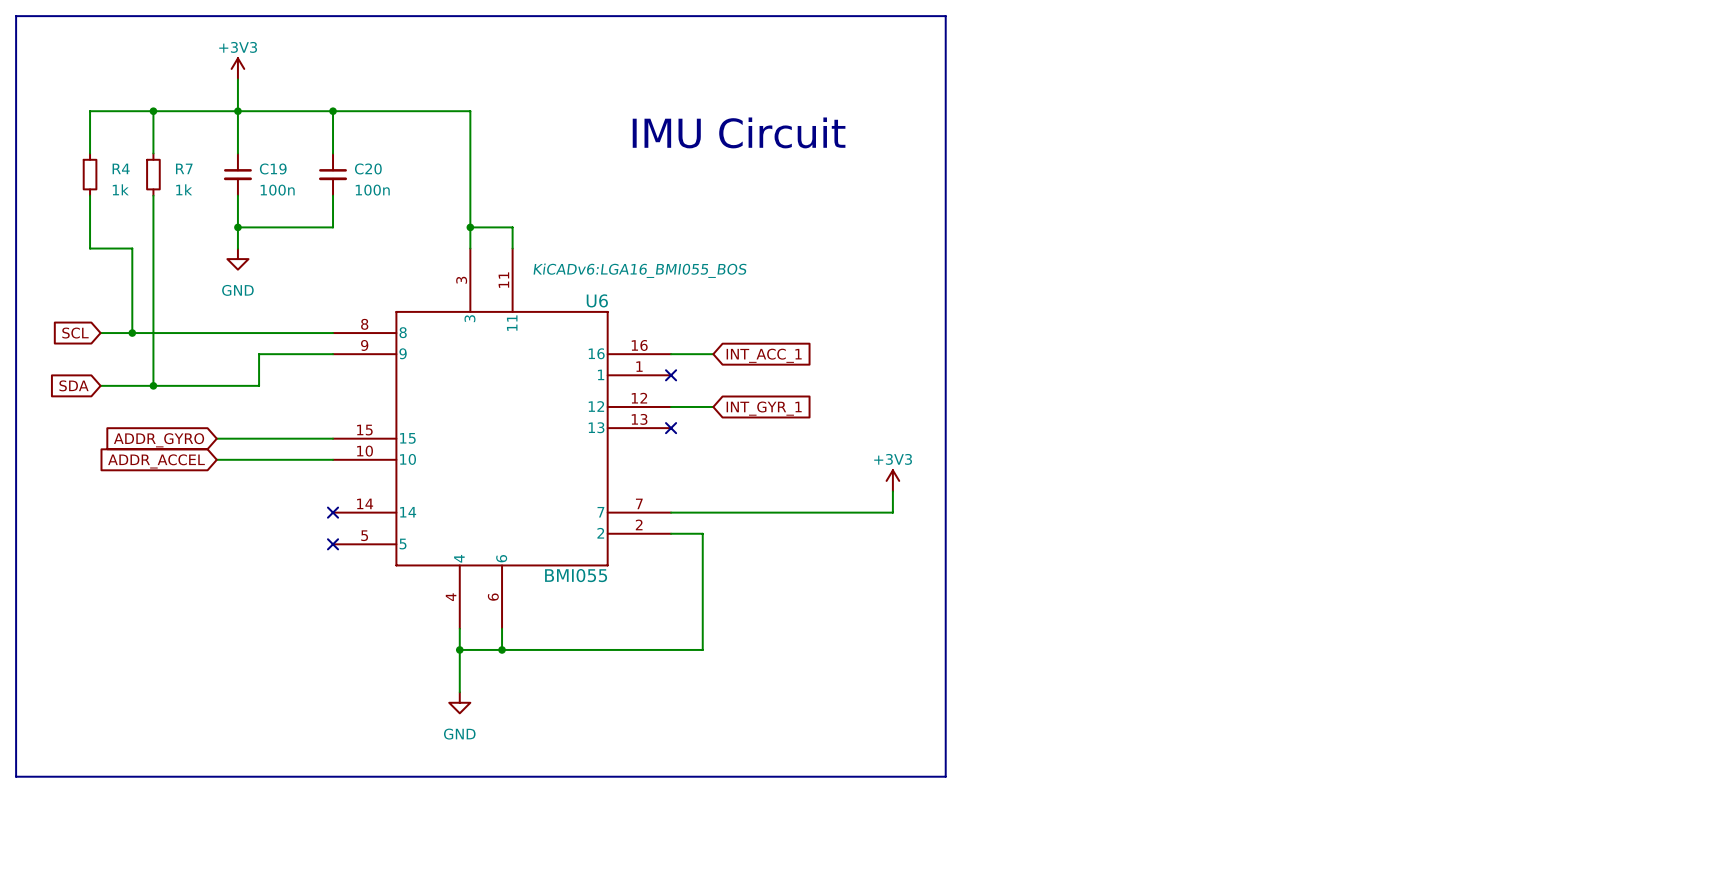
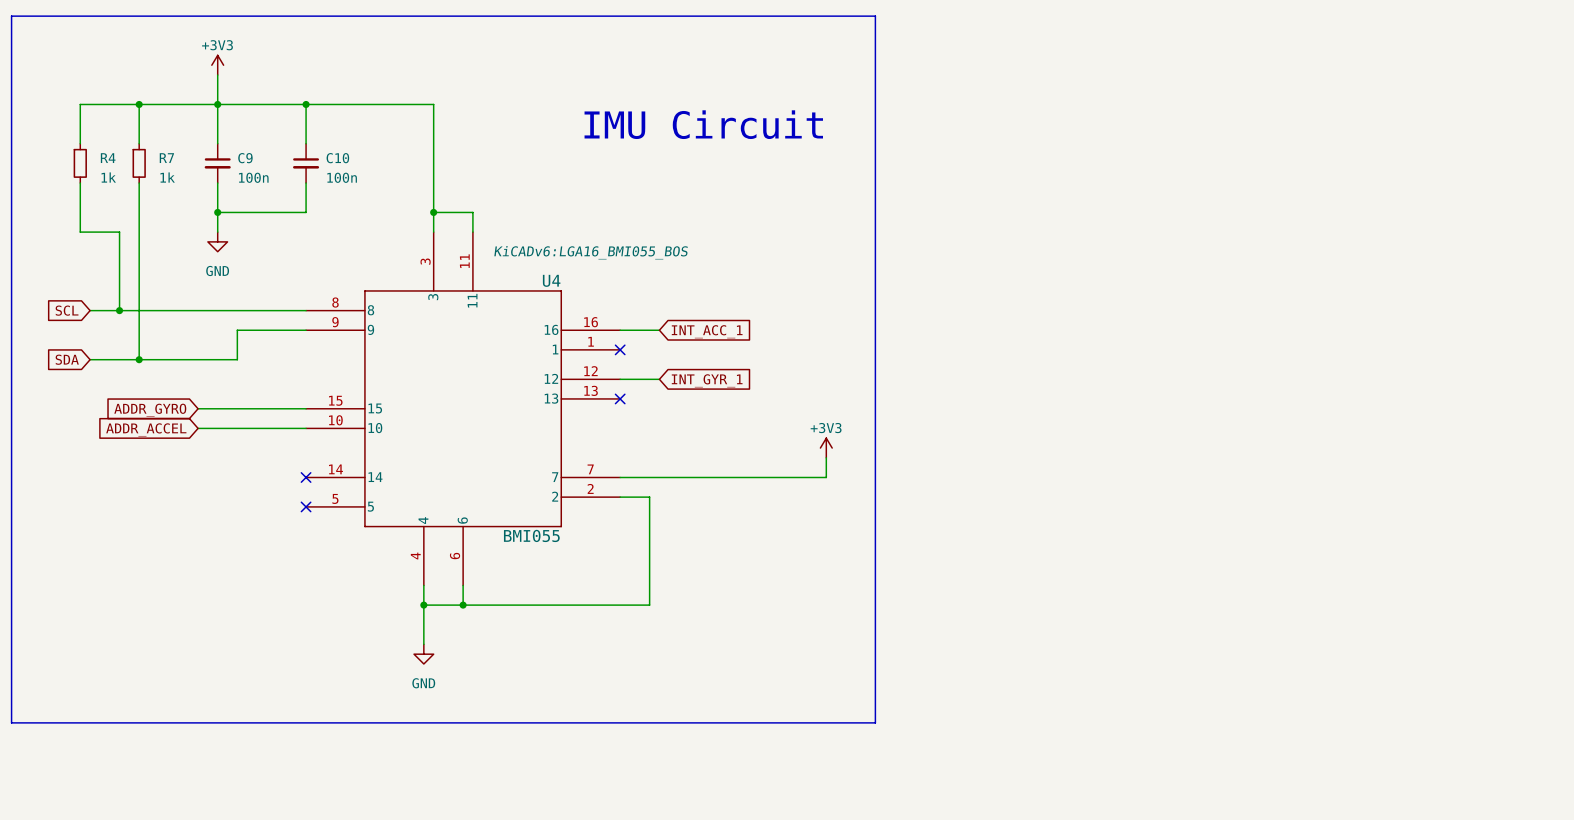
C19 name: C19 (273, 168) -> C9 (245, 158)
C20 name: C20 (368, 168) -> C10 (337, 158)
U6 name: U6 (597, 300) -> U4 (551, 280)

